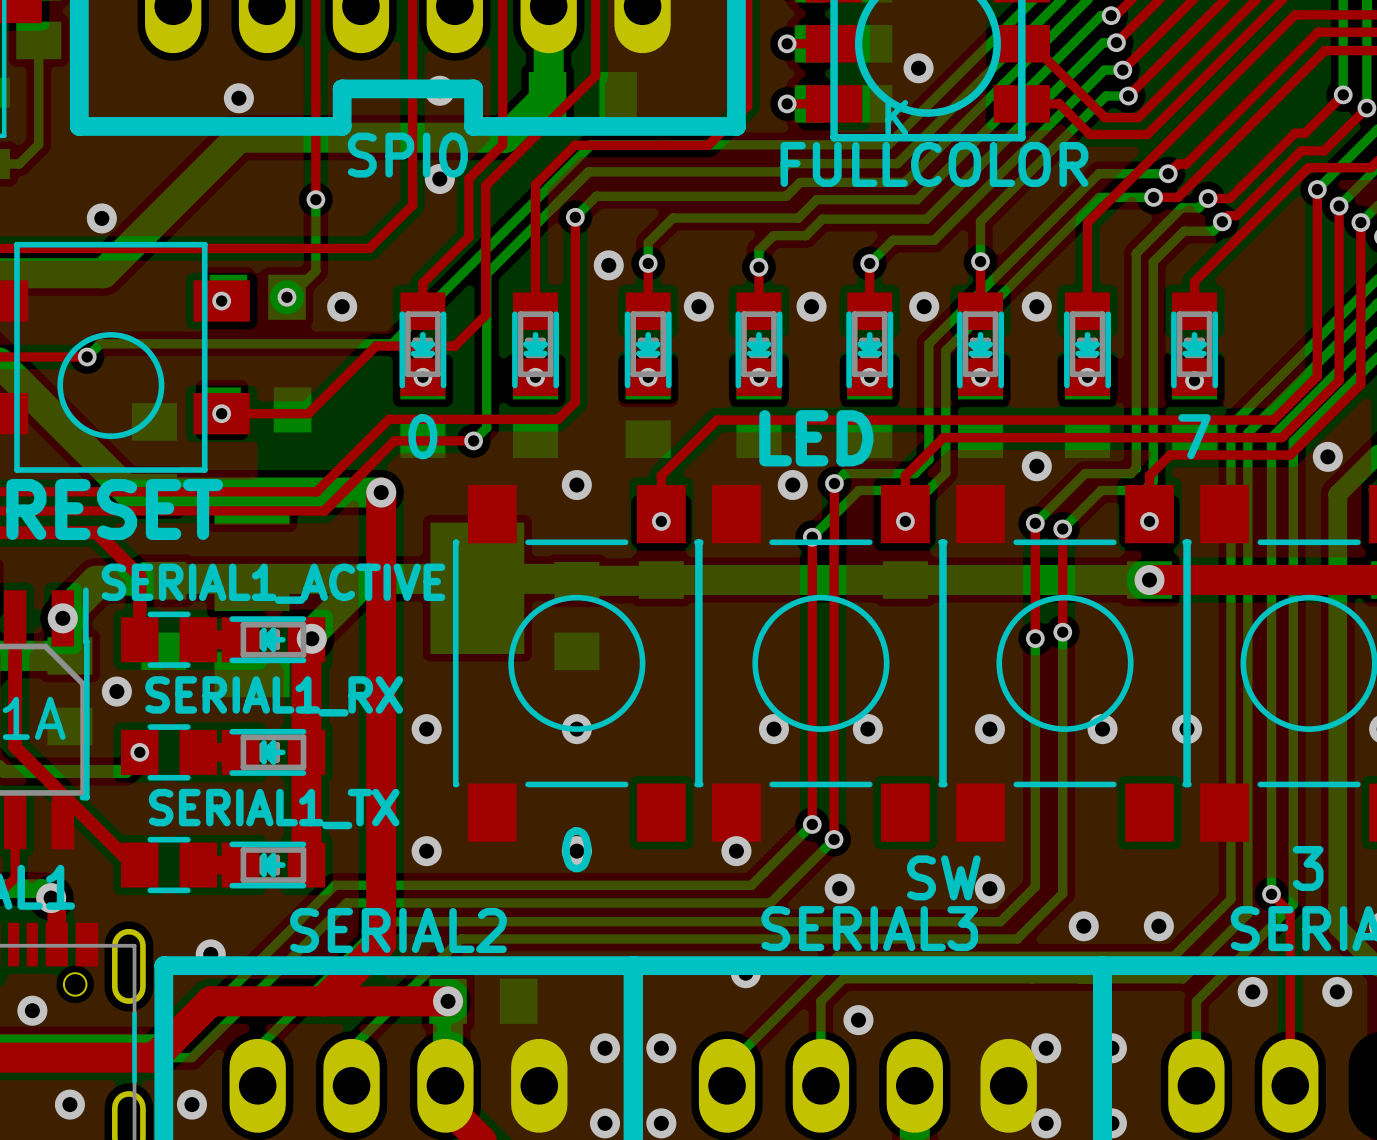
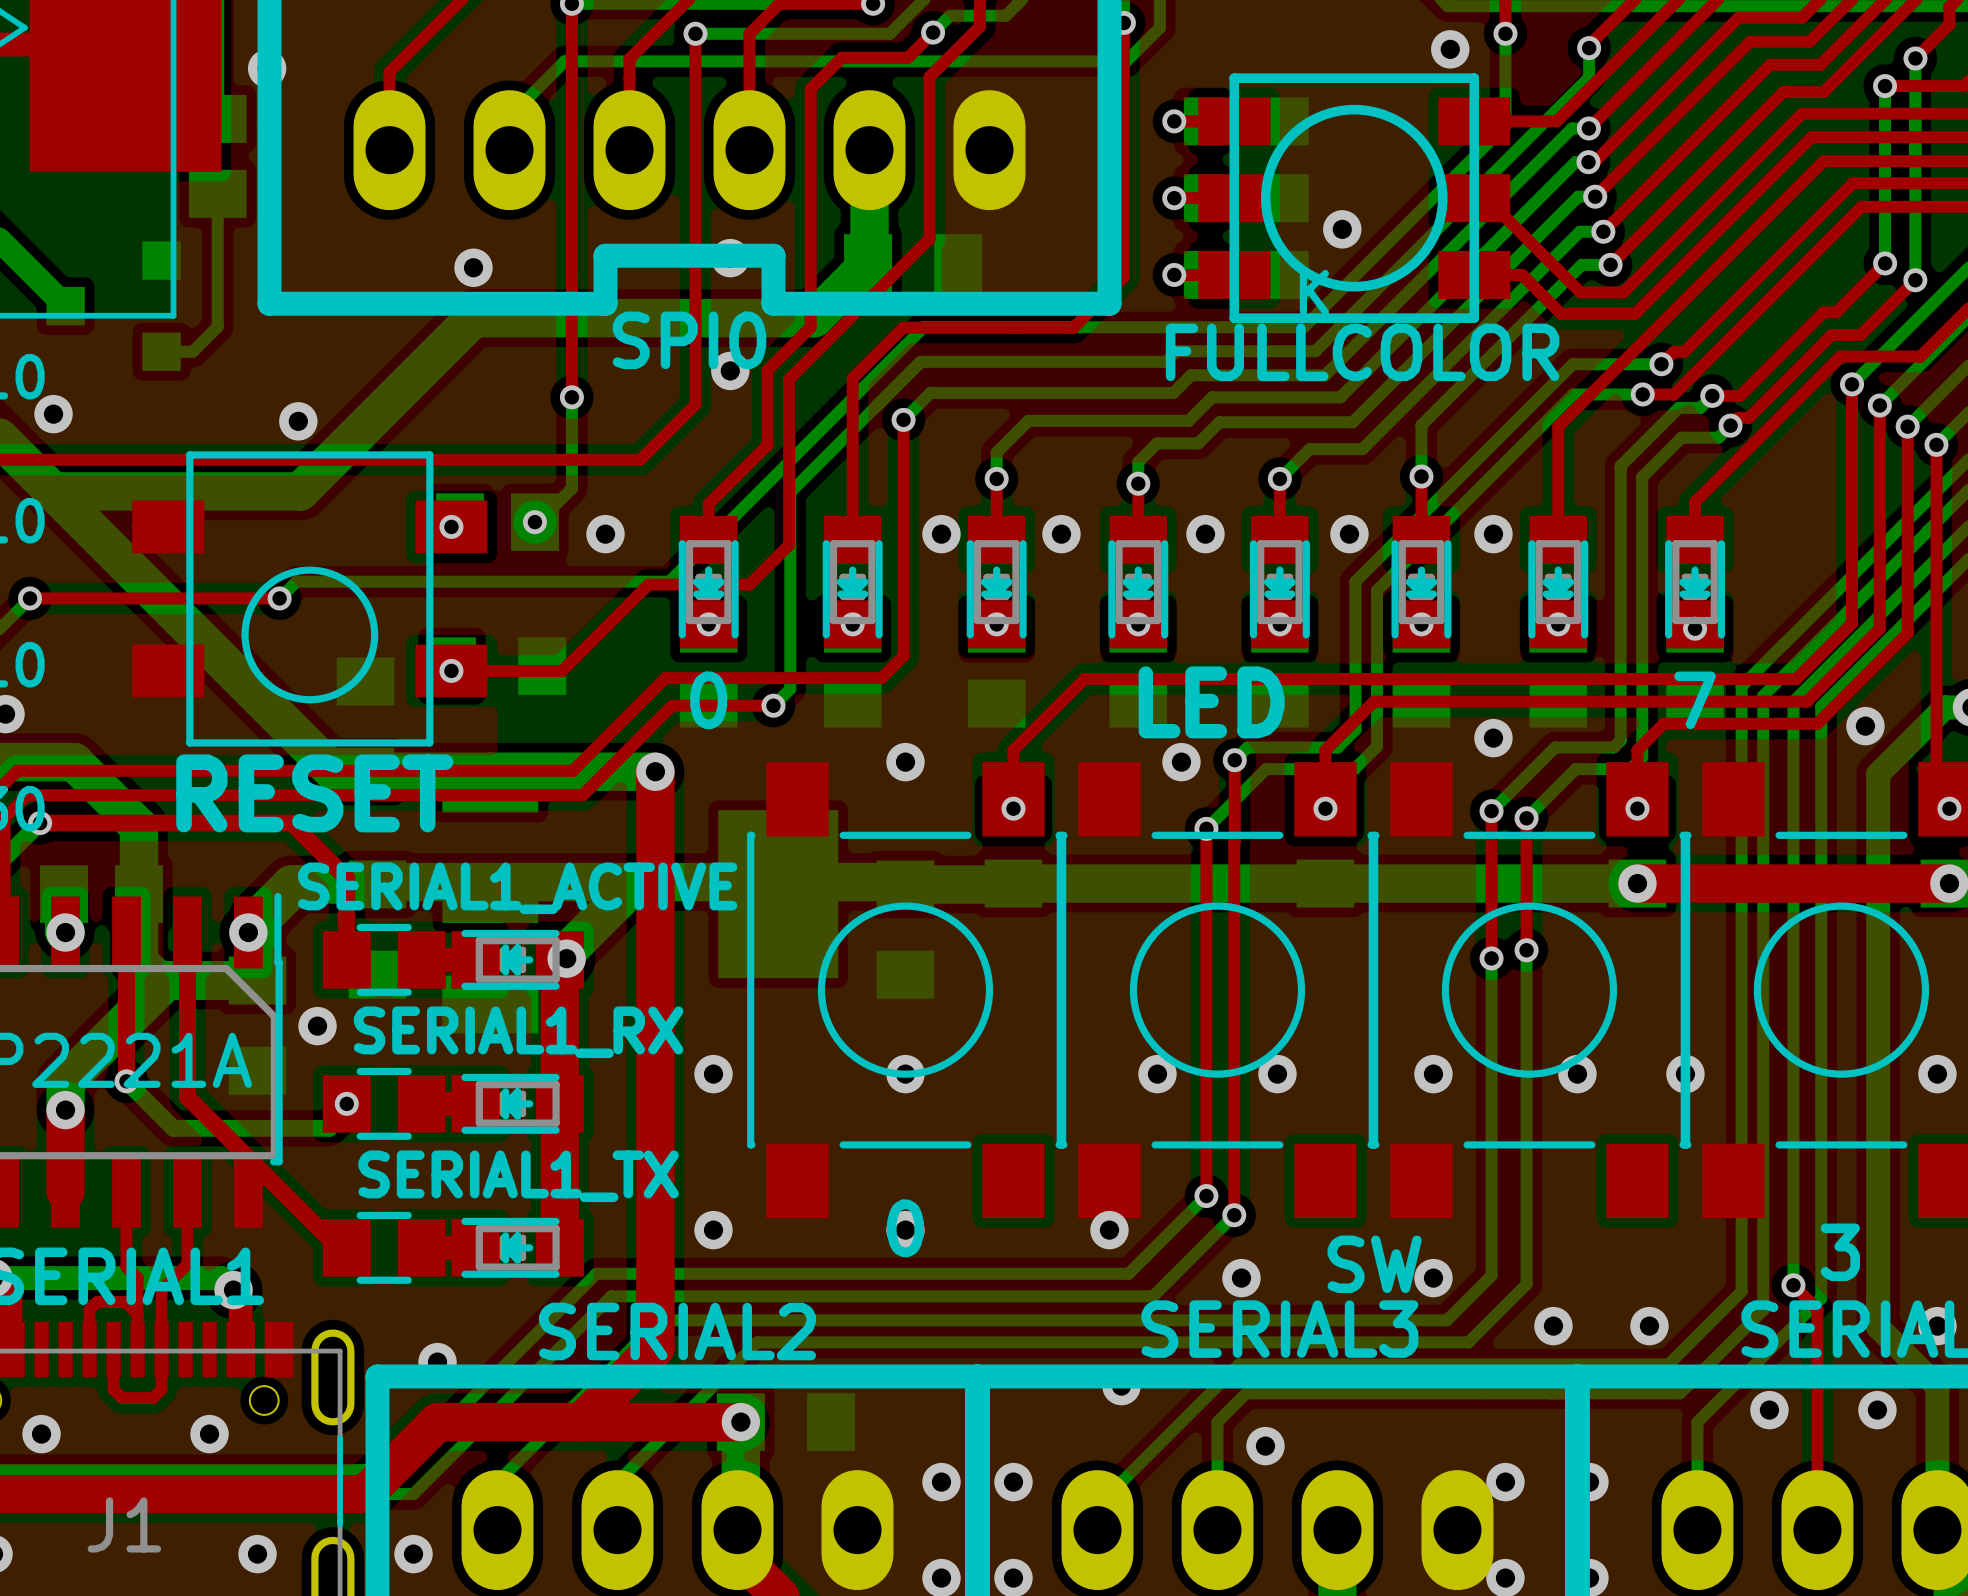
via position: (608, 265) -> (941, 534)

